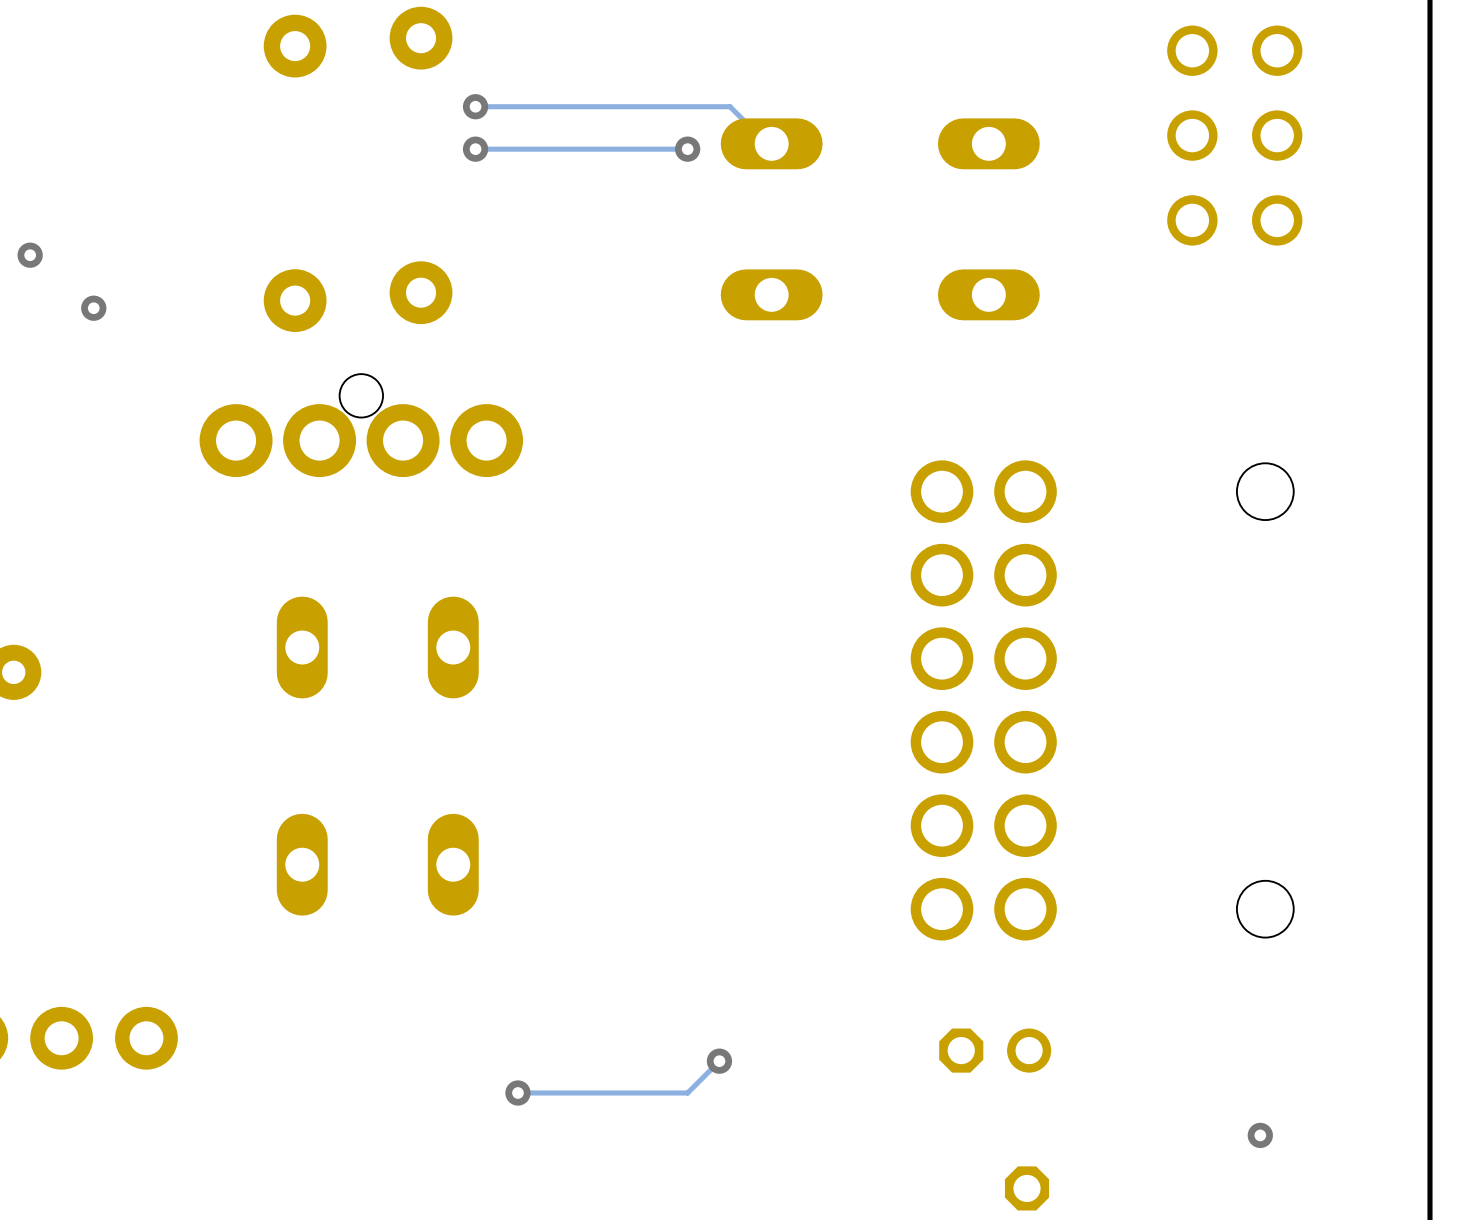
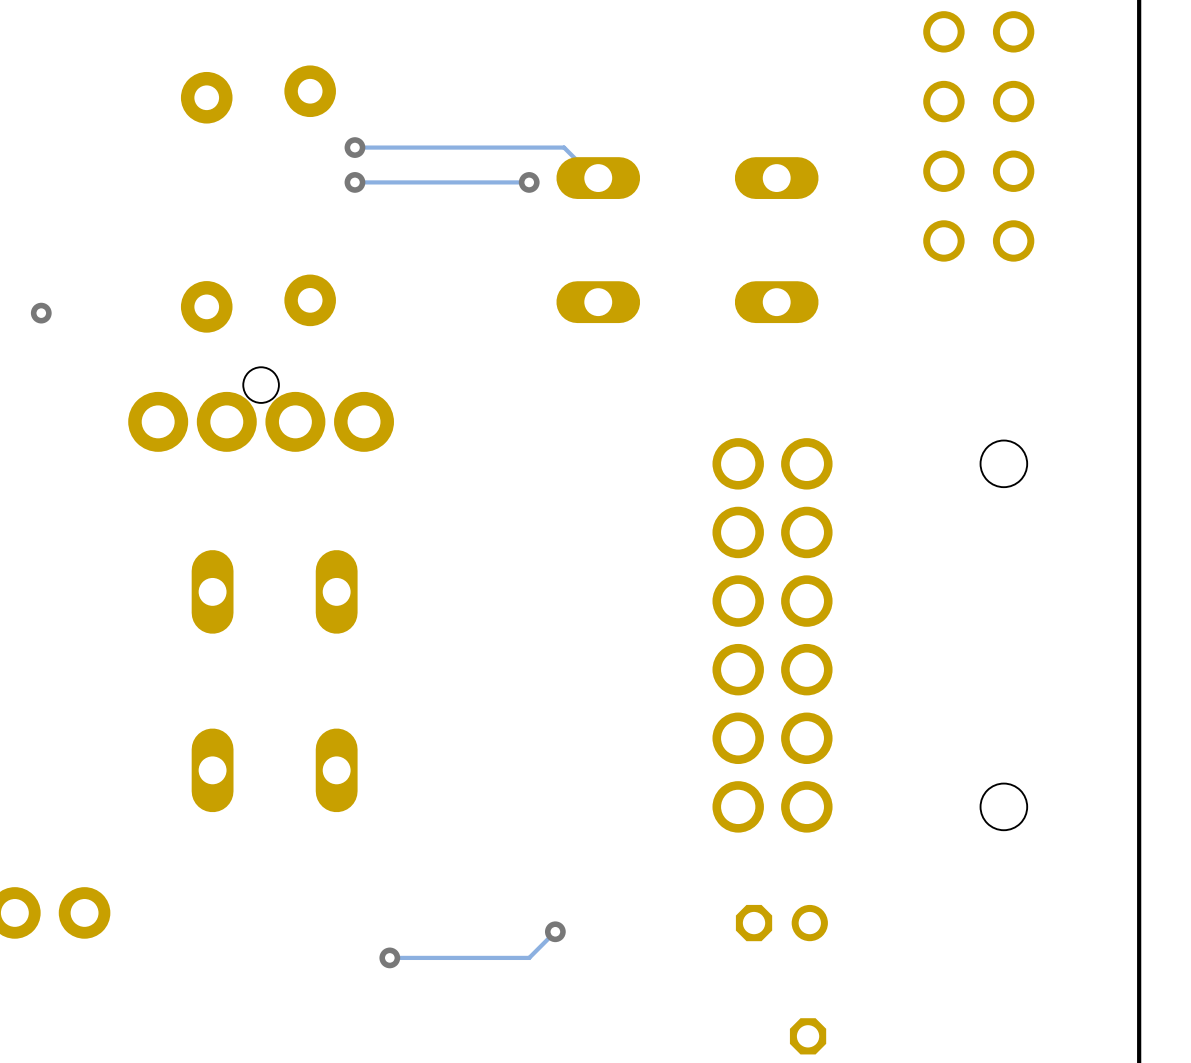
via: (1260, 1135) -> none

